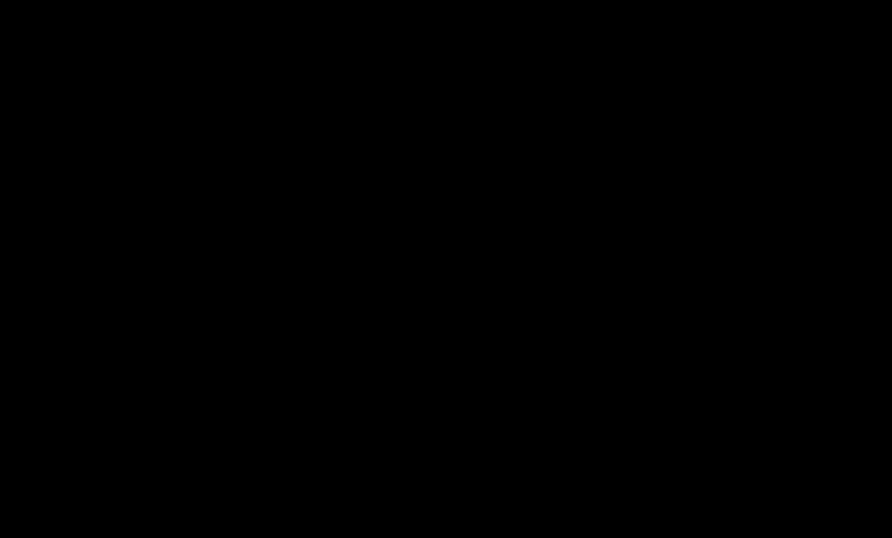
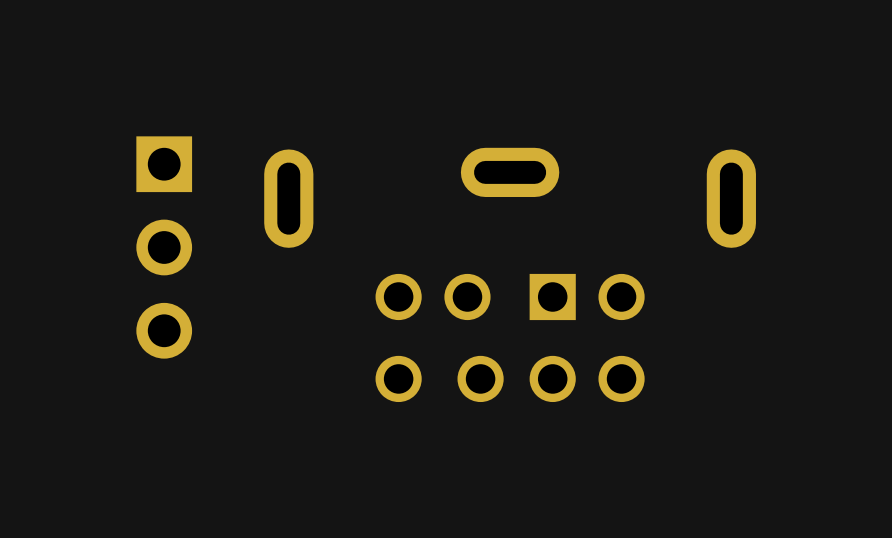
part: none -> (164, 247)
part: none -> (510, 274)

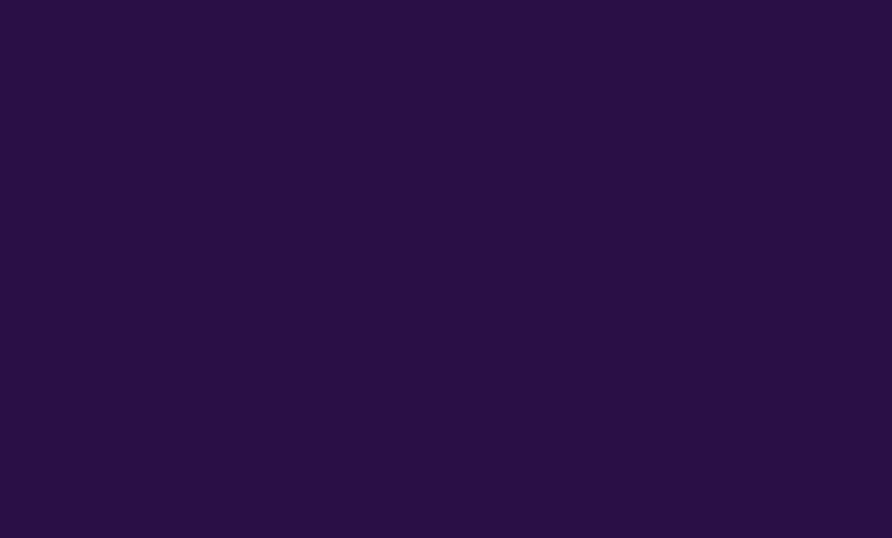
part: (164, 247) -> none
part: (510, 274) -> none

